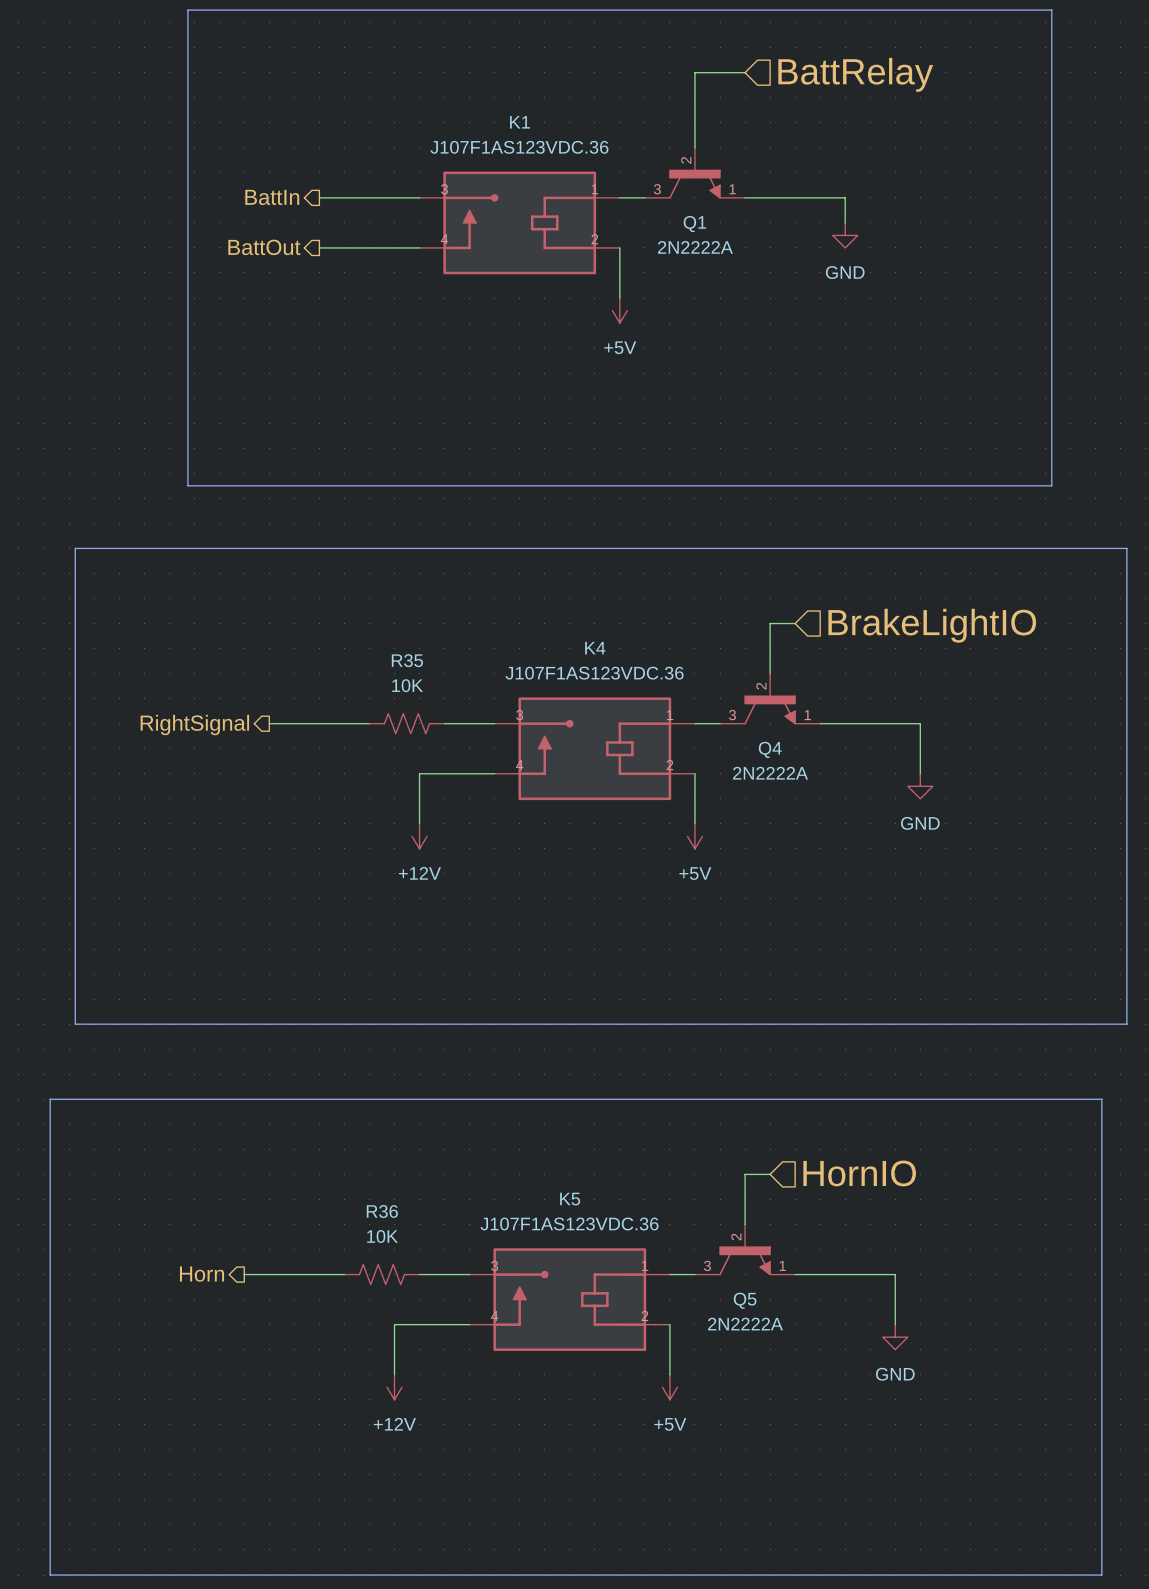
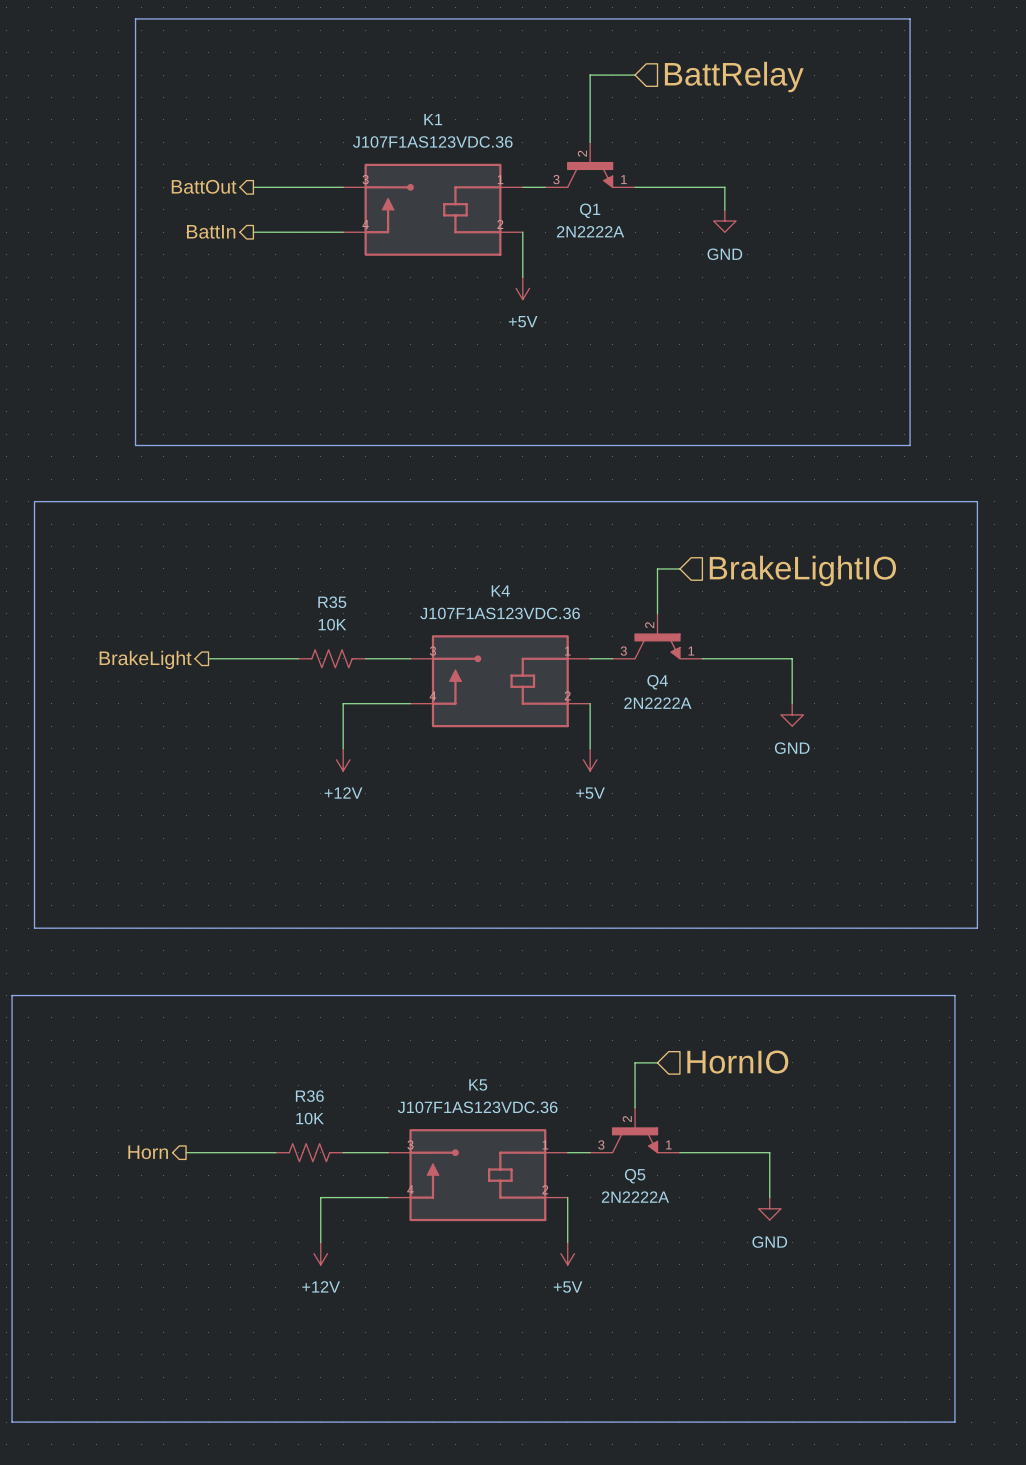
hierarchical label: BattIn (272, 197) -> BattOut (204, 186)
hierarchical label: BattOut (264, 247) -> BattIn (211, 231)
hierarchical label: RightSignal (194, 725) -> BrakeLight (145, 659)

